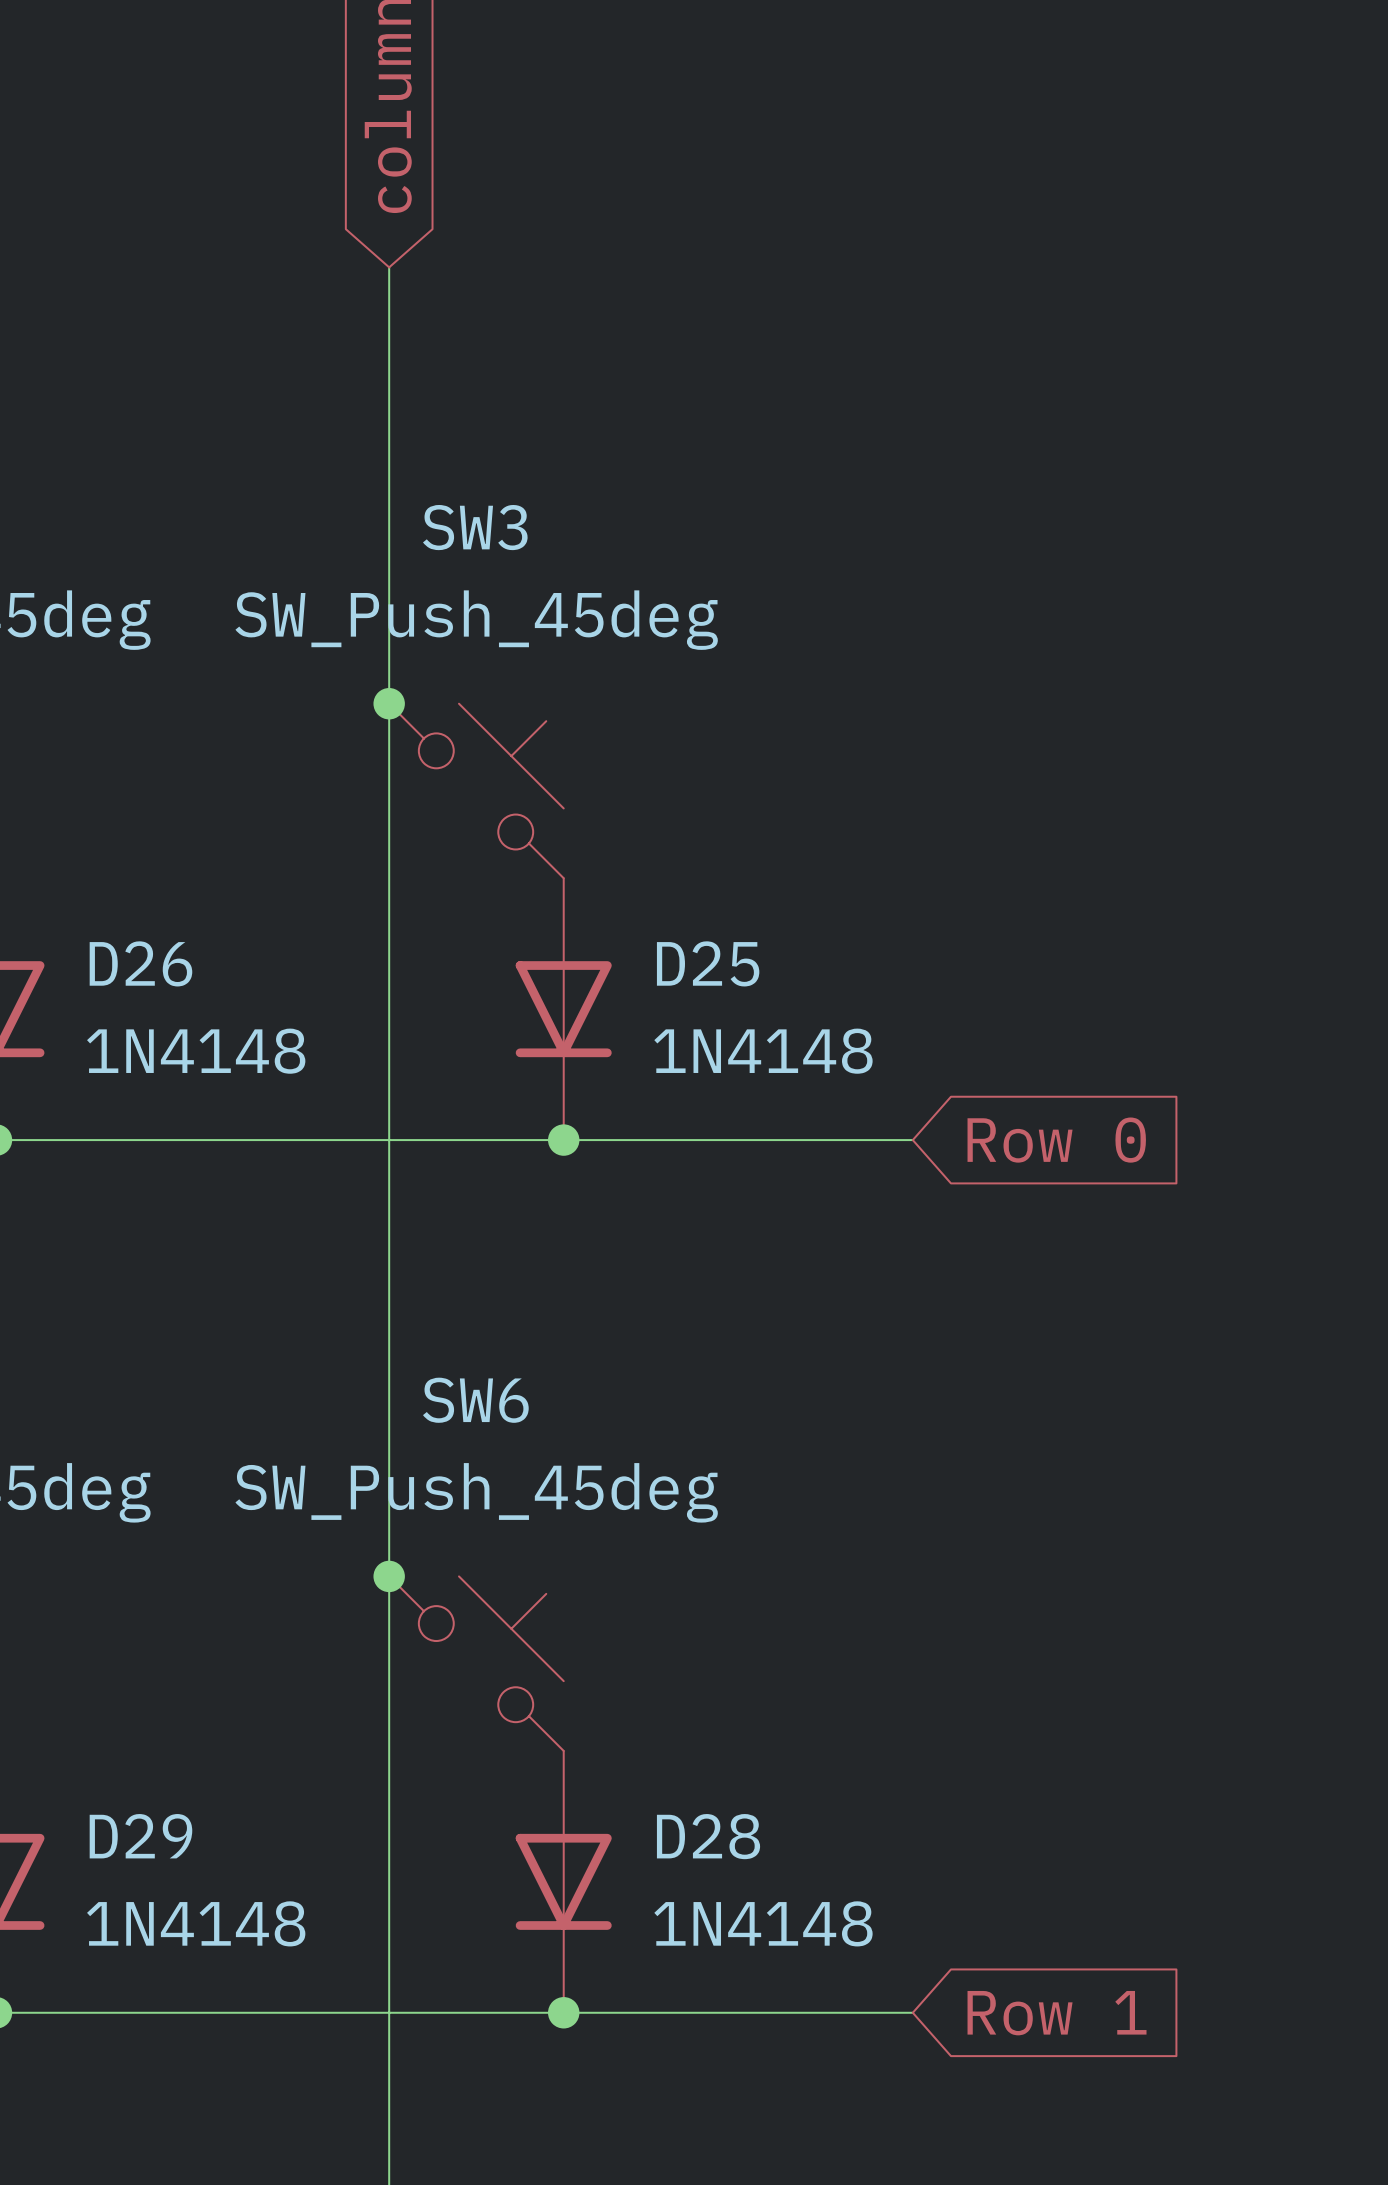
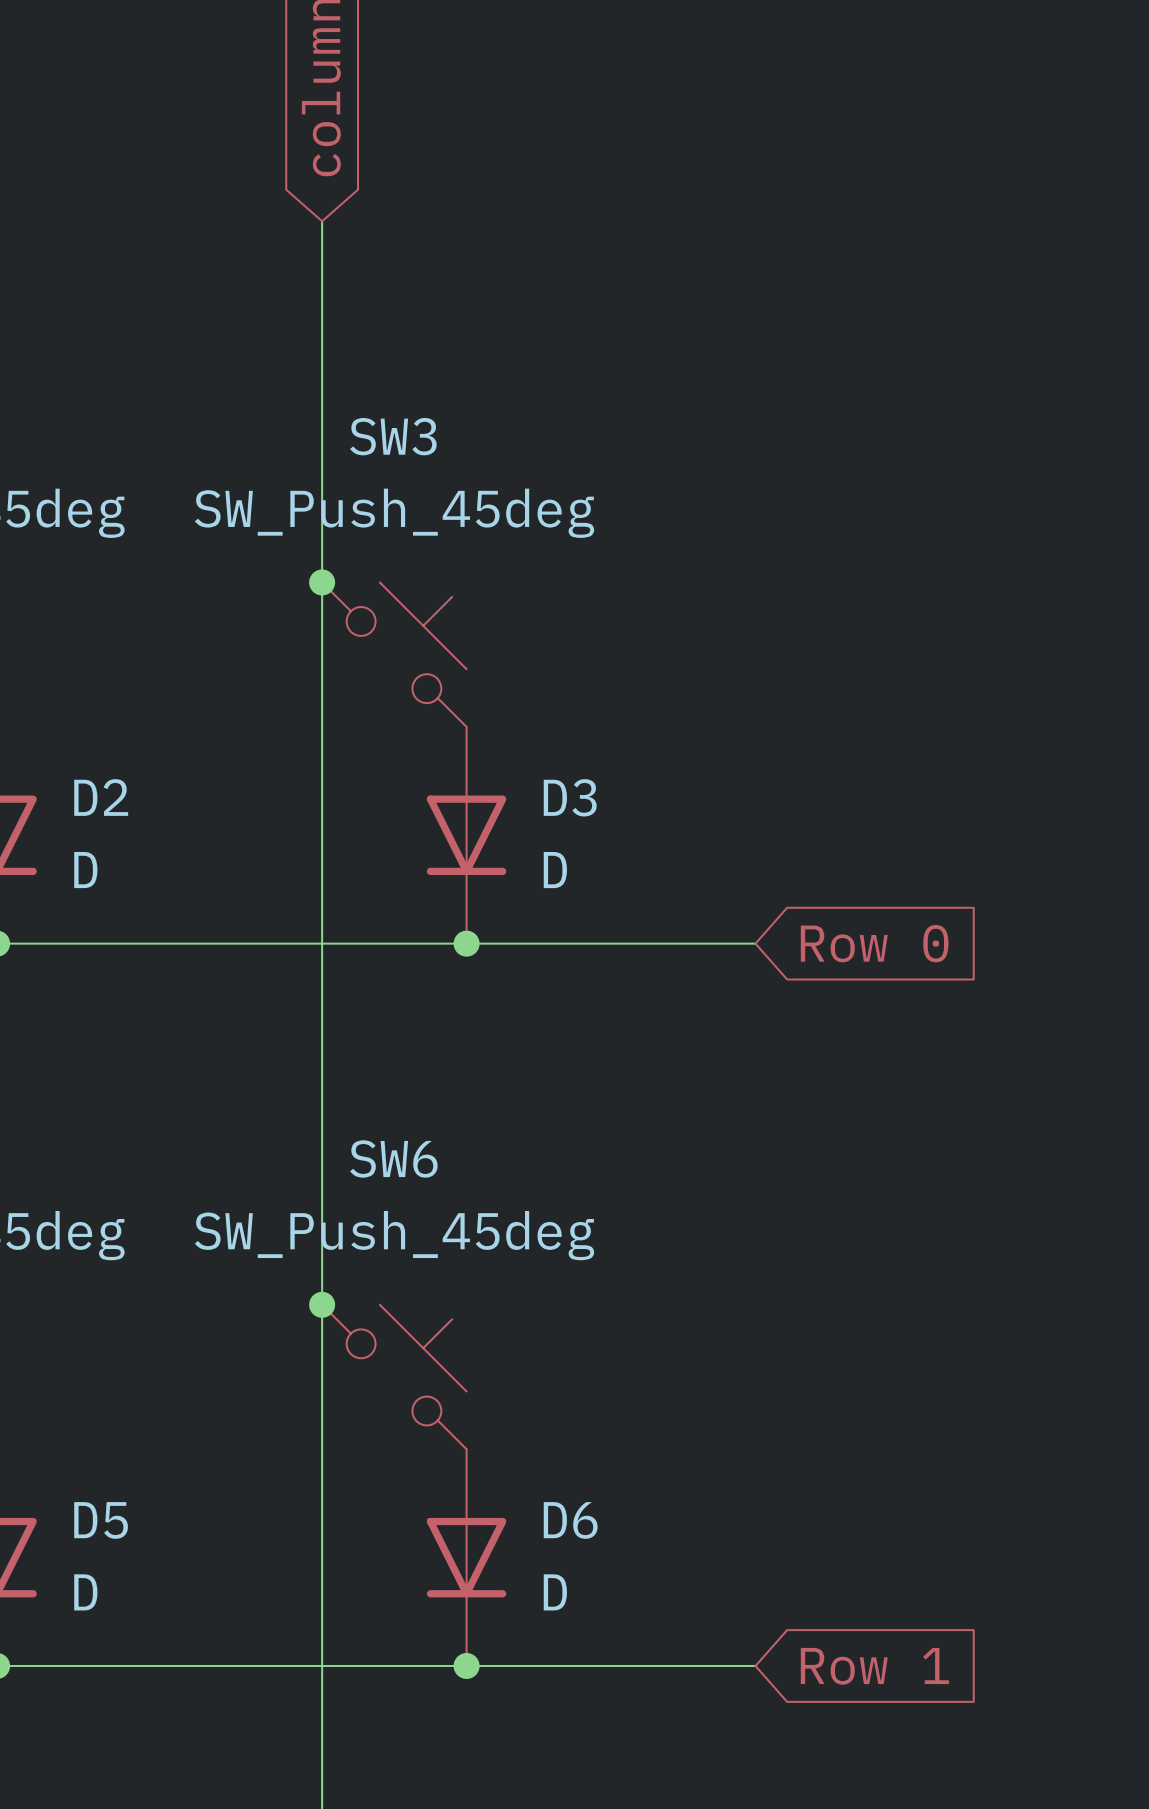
D26 name: D26 (140, 963) -> D2 (101, 797)
D25 name: D25 (708, 963) -> D3 (570, 797)
D26 value: 1N4148 (196, 1051) -> D (85, 870)
D25 value: 1N4148 (763, 1051) -> D (555, 870)
D29 name: D29 (140, 1836) -> D5 (101, 1520)
D28 name: D28 (708, 1836) -> D6 (570, 1520)
D29 value: 1N4148 (196, 1923) -> D (85, 1592)
D28 value: 1N4148 (763, 1923) -> D (555, 1592)

